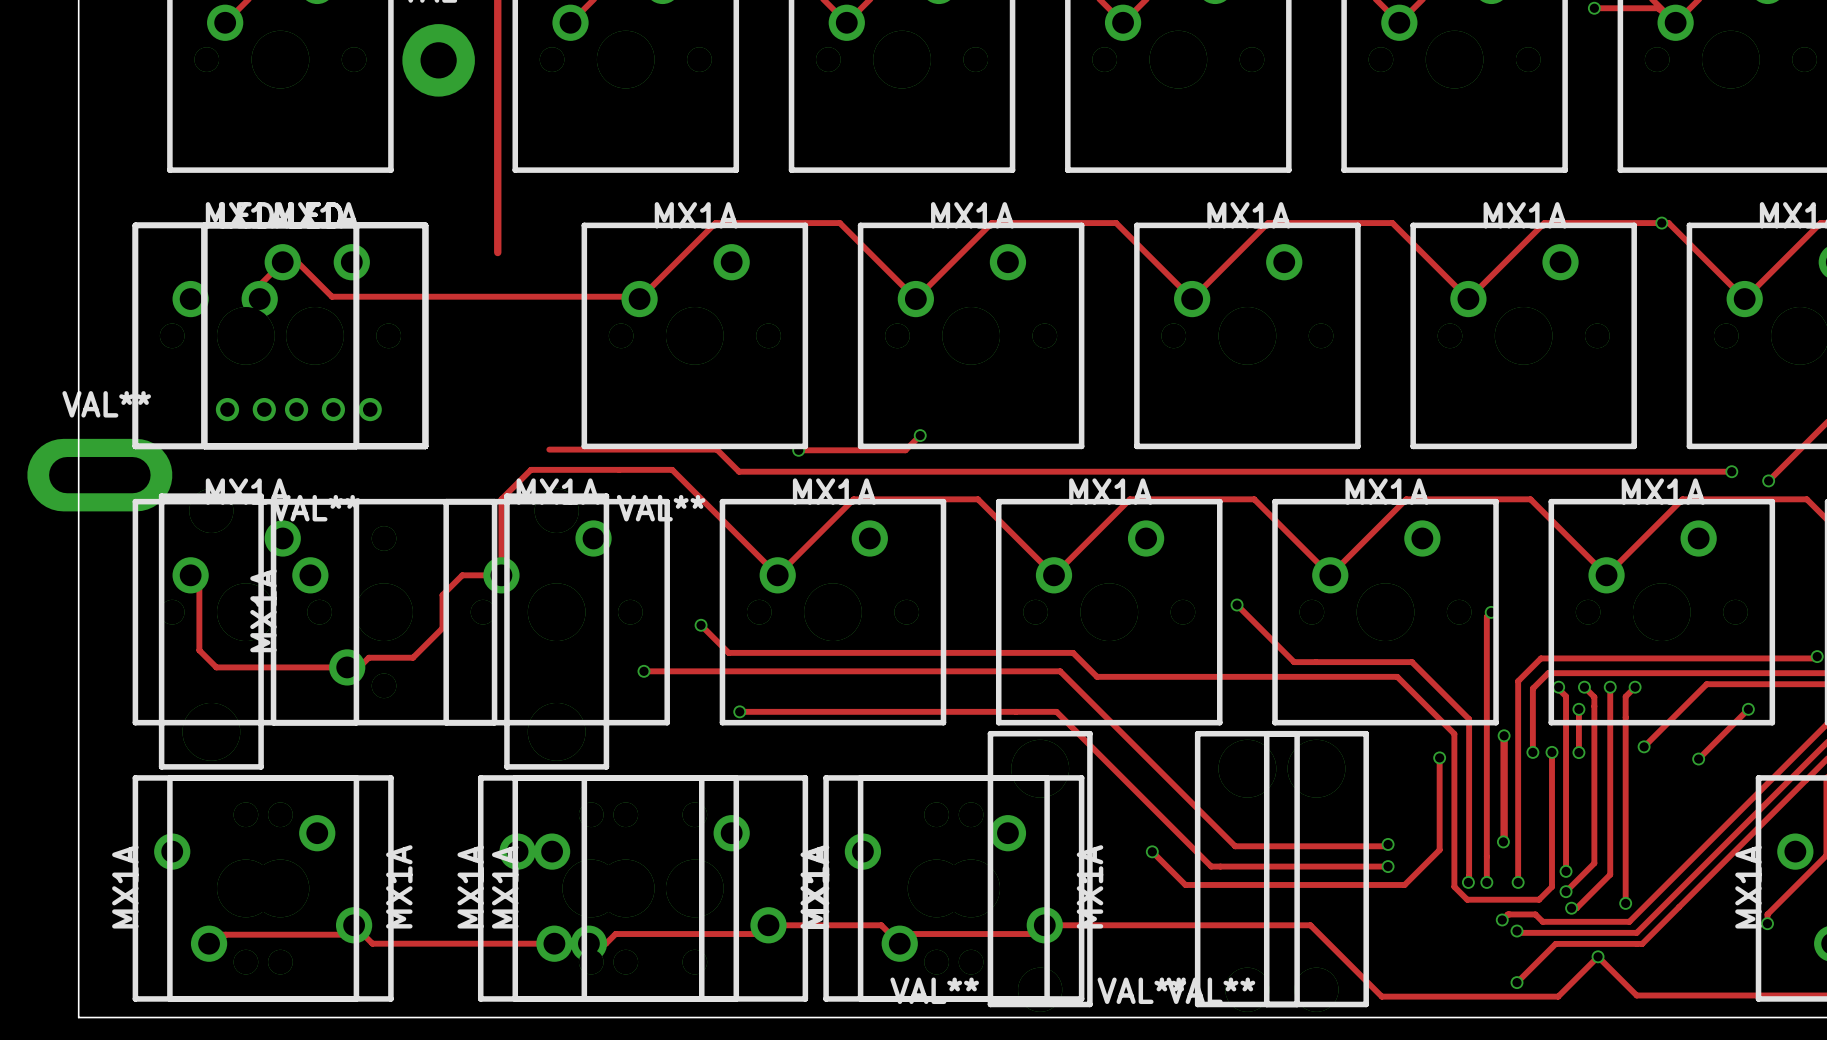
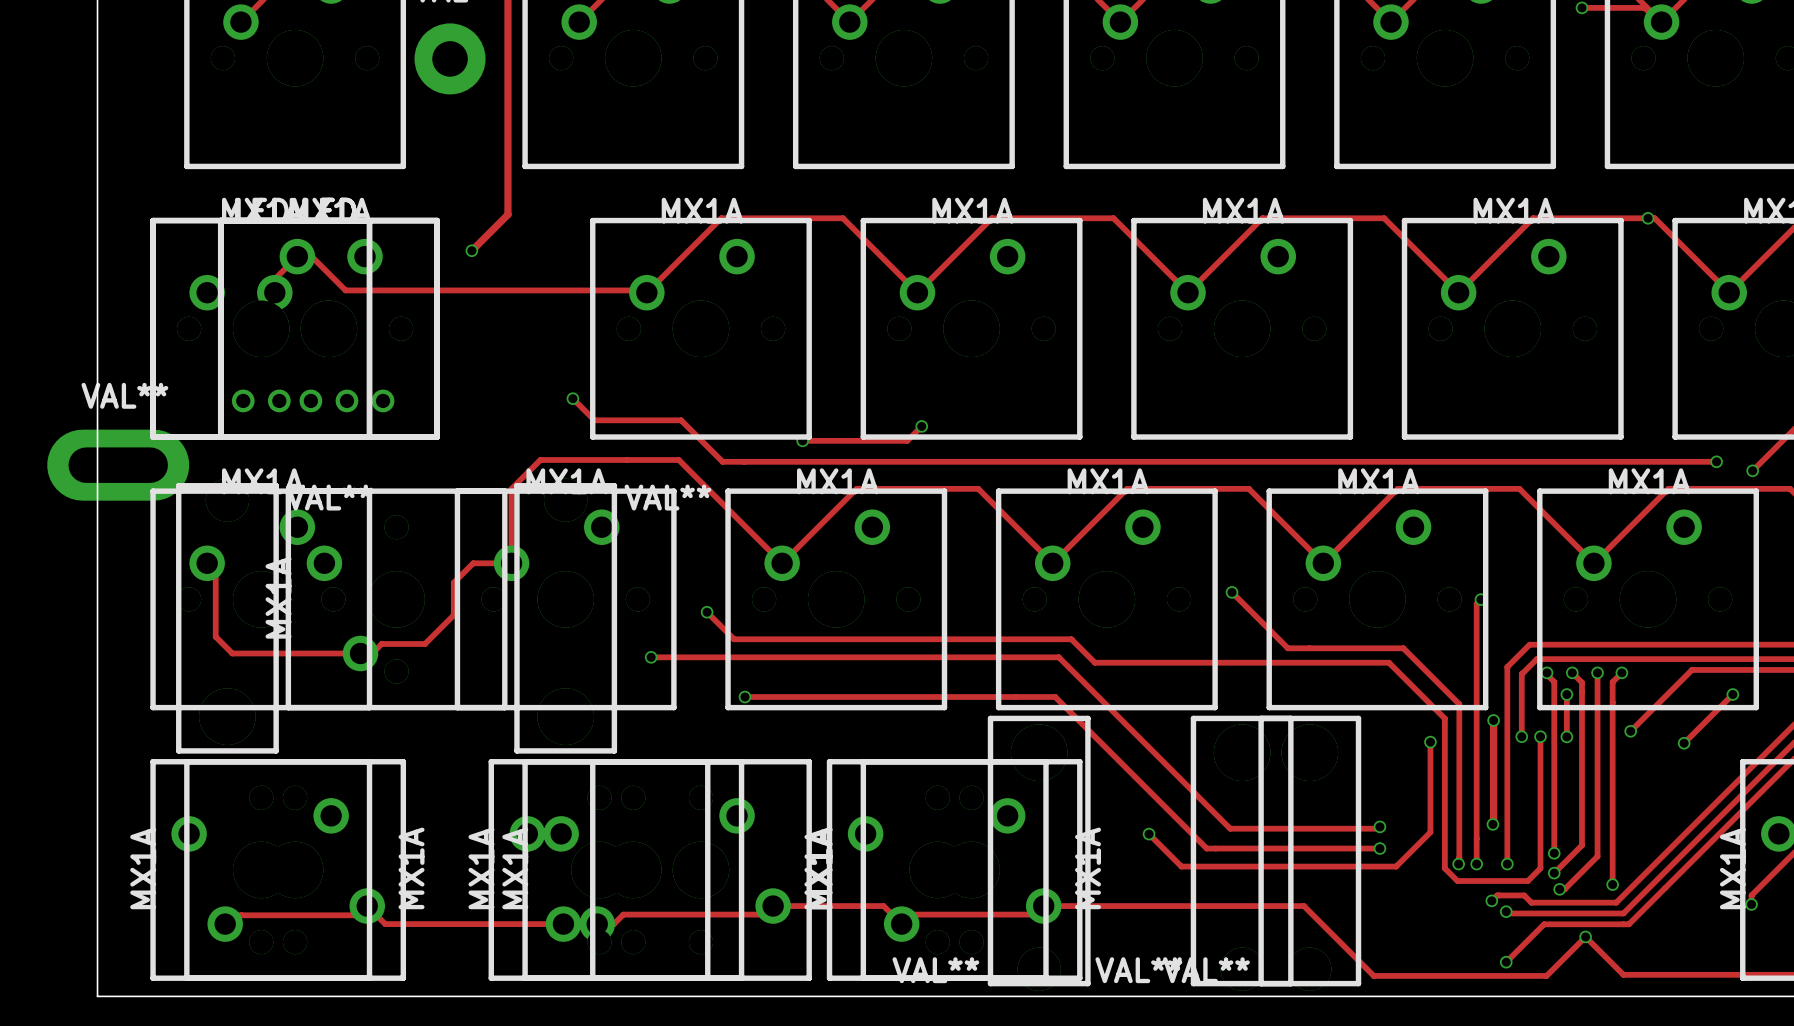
track: (497, 219) (497, 252) -> (507, 214) (471, 250)
via: none -> (471, 250)
via: none -> (572, 398)
track: (549, 449) (716, 449) (739, 471) -> (572, 398) (594, 420) (681, 420) (722, 461) (744, 461)

